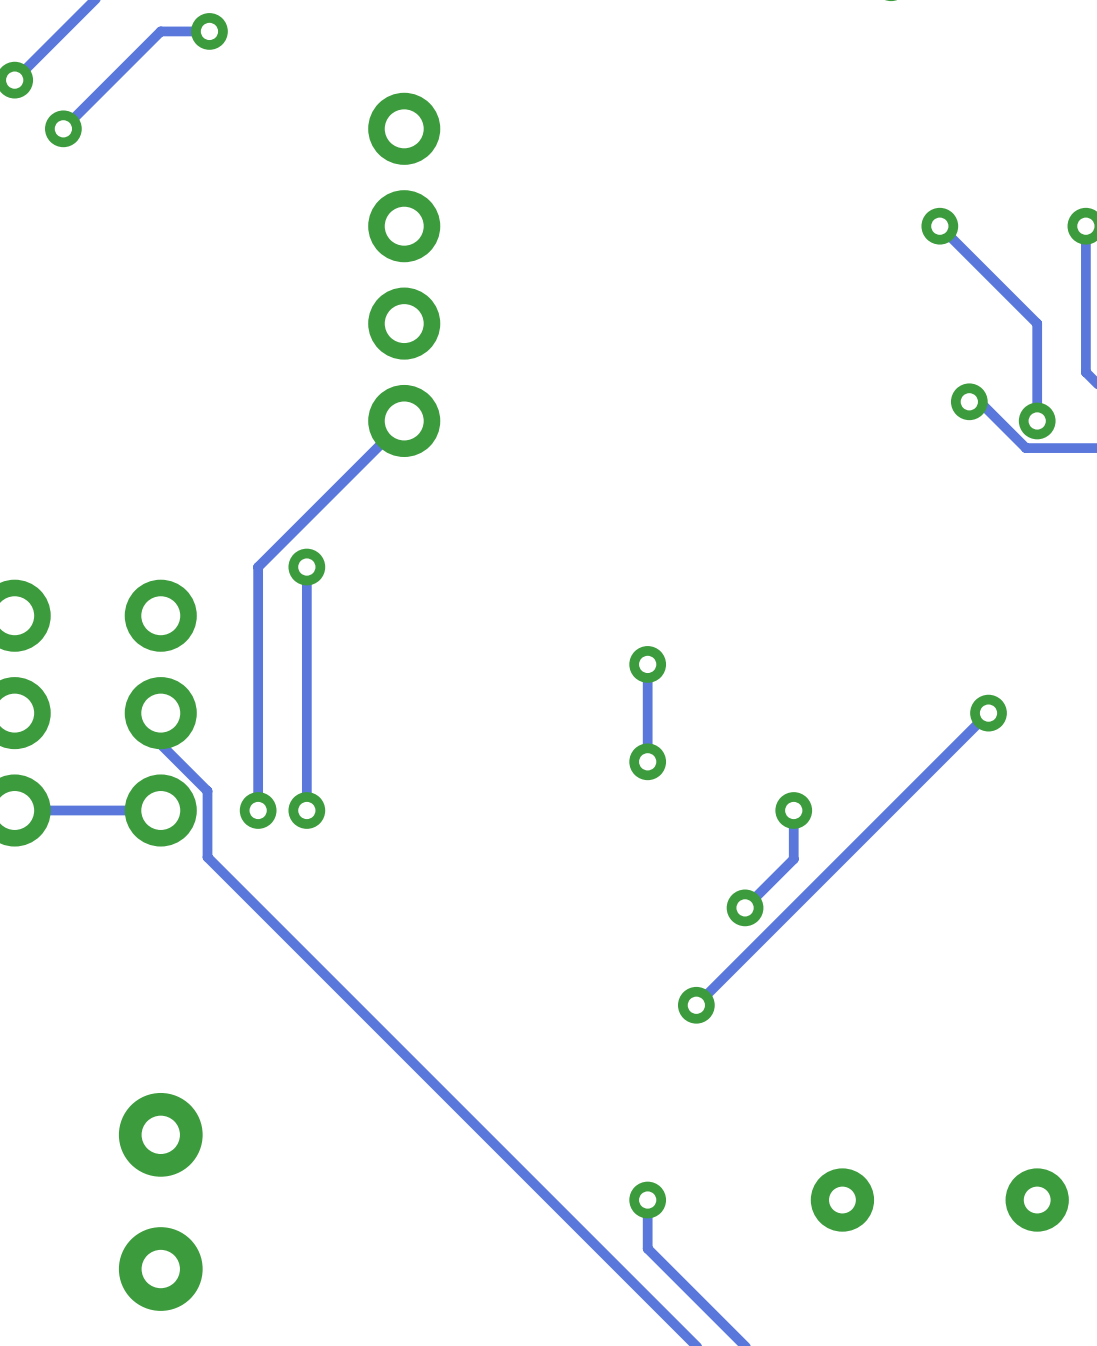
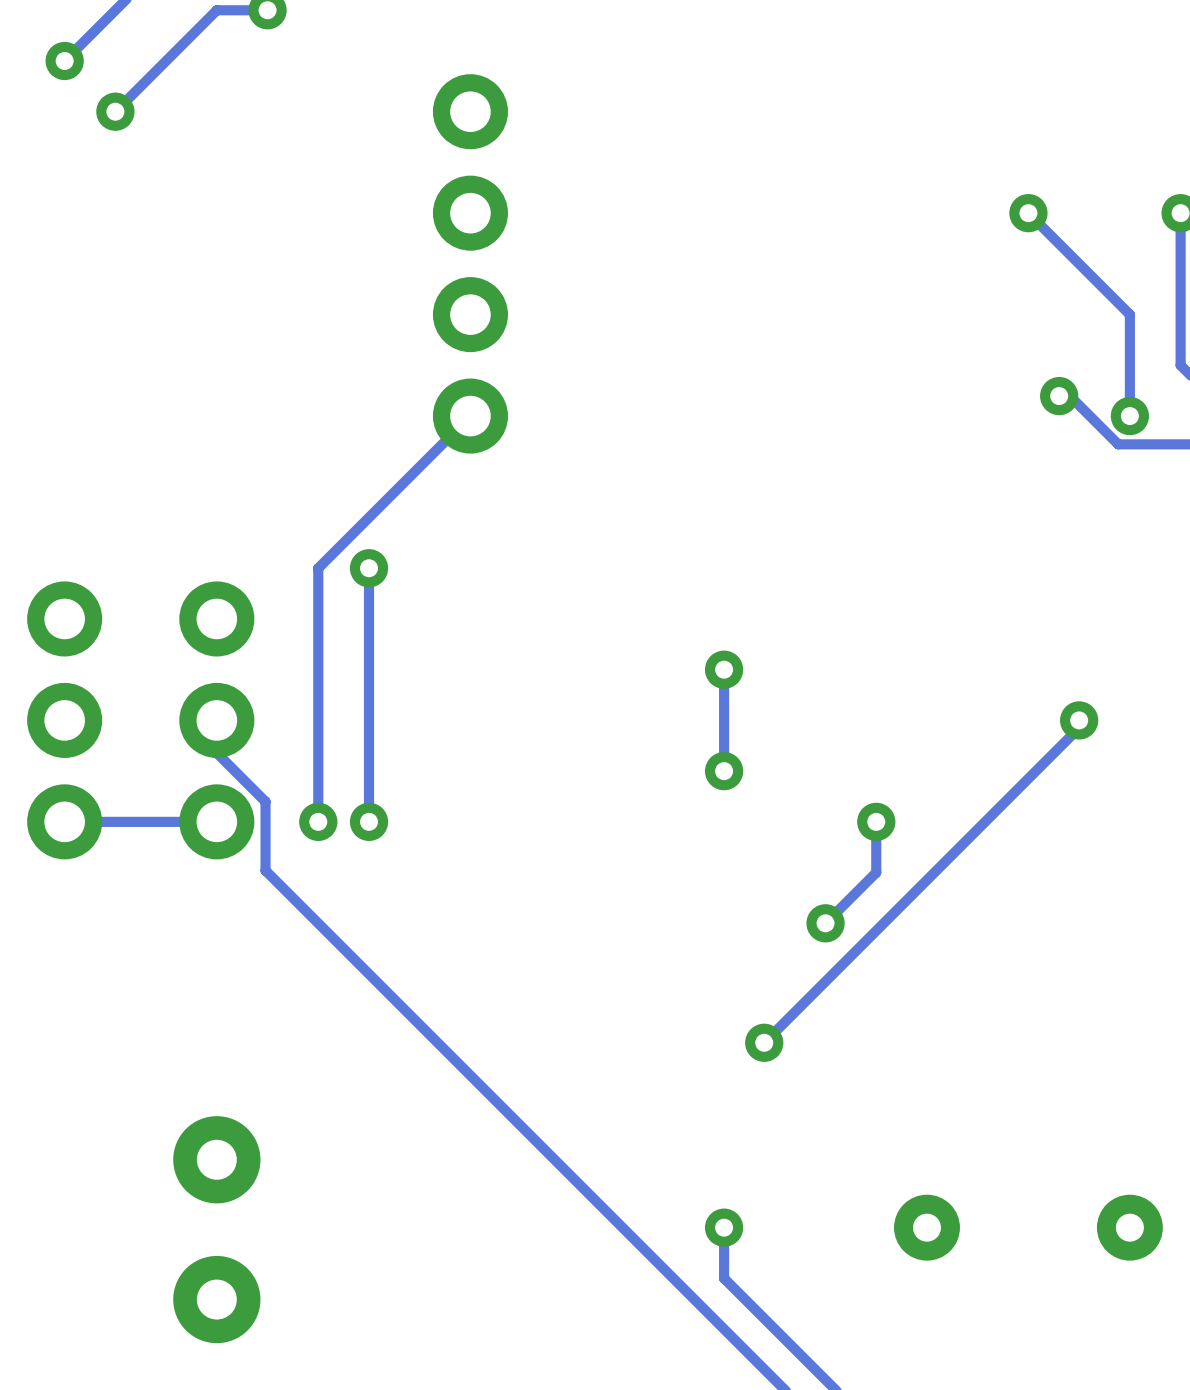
track: (988, 713) (696, 1005) -> (1079, 720) (1079, 727) (764, 1042)
via position: (696, 1005) -> (764, 1042)

